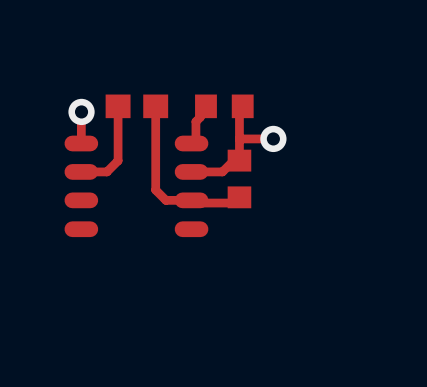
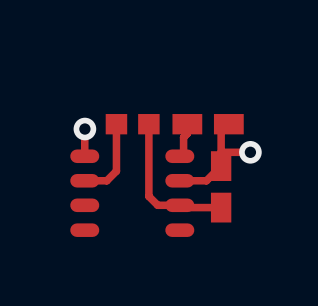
part footprint: [195, 94, 254, 119] -> [172, 114, 244, 135]
part footprint: [227, 149, 252, 209] -> [210, 151, 232, 223]

